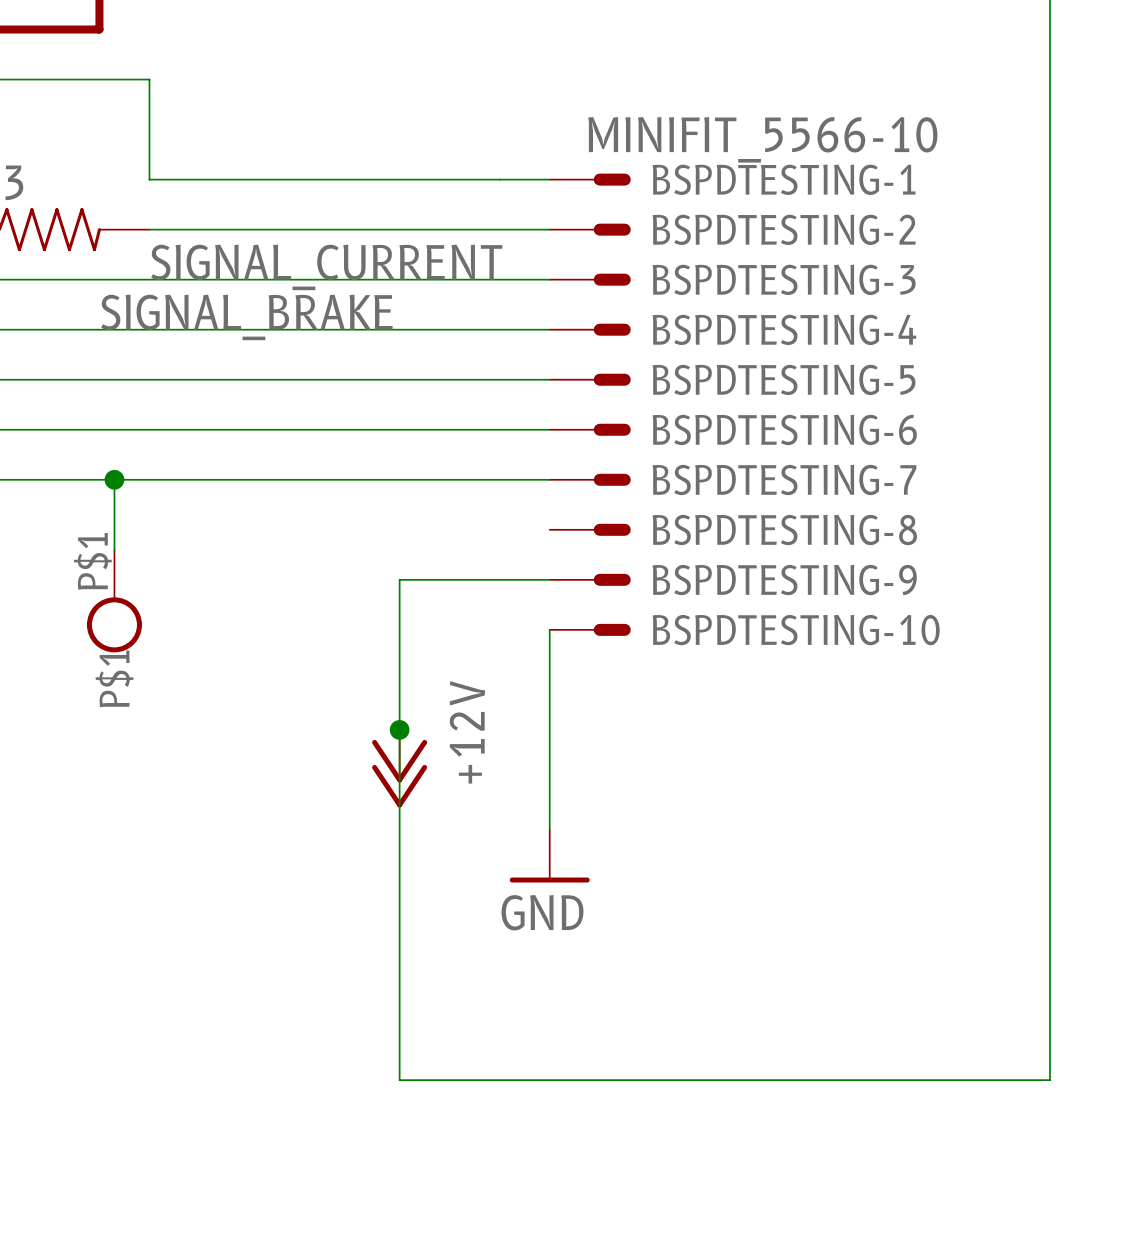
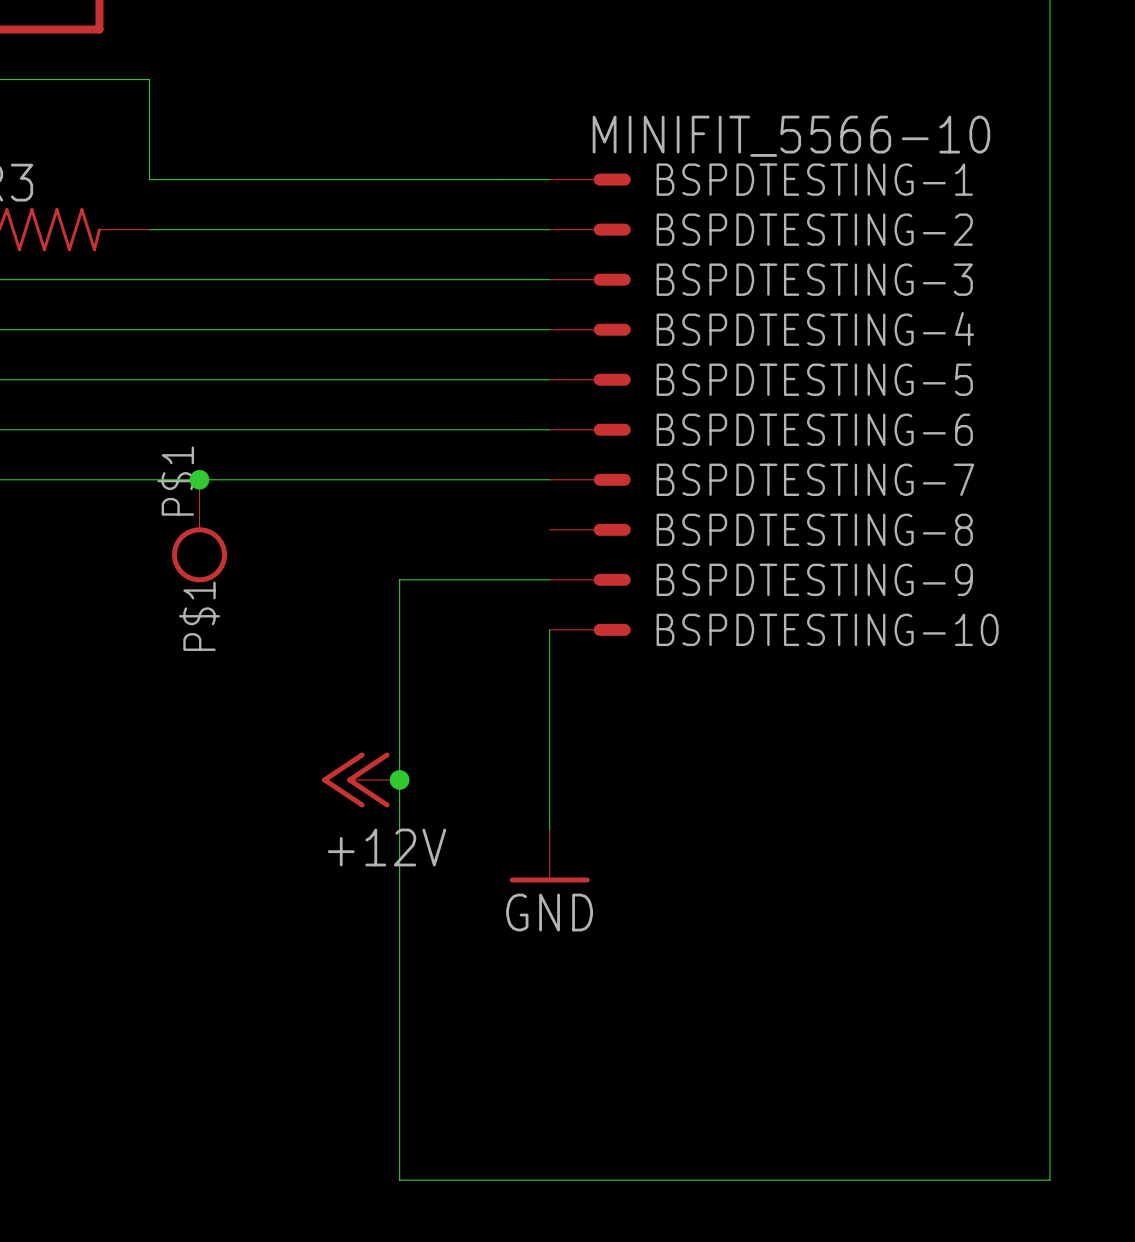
label: SIGNAL_CURRENT (326, 267) -> none
label: SIGNAL_BRAKE (246, 317) -> none
wire: (114, 479) (114, 549) -> none
junction position: (114, 479) -> (199, 479)
part position: (114, 601) -> (199, 531)
junction position: (399, 729) -> (399, 779)
power symbol rotation: 0° (399, 773) -> 90° clockwise (355, 779)
wire: (399, 1080) (1050, 1080) -> (399, 1080) (399, 1180) (1050, 1180) (1050, 1080)

